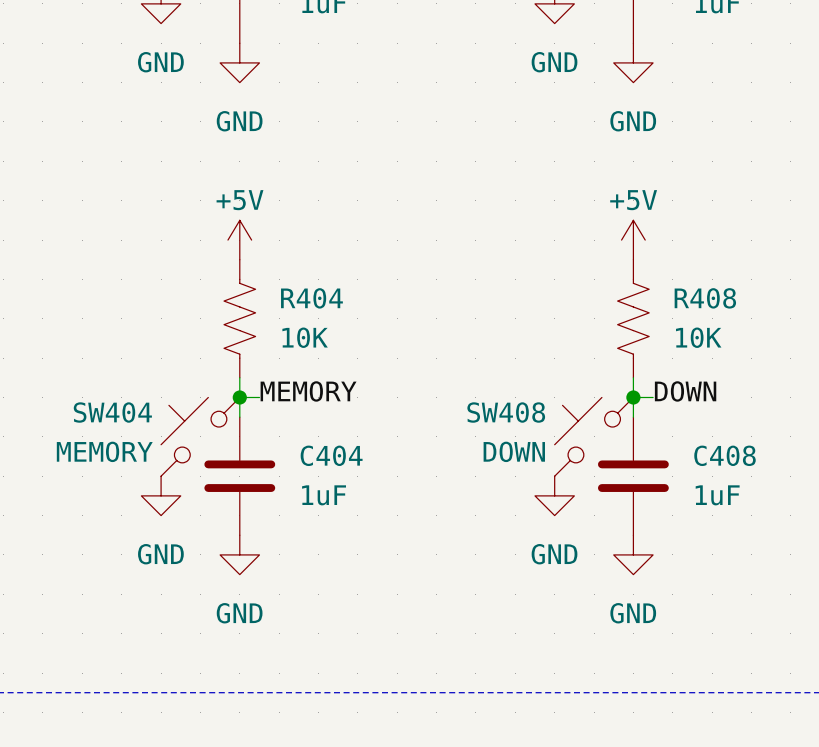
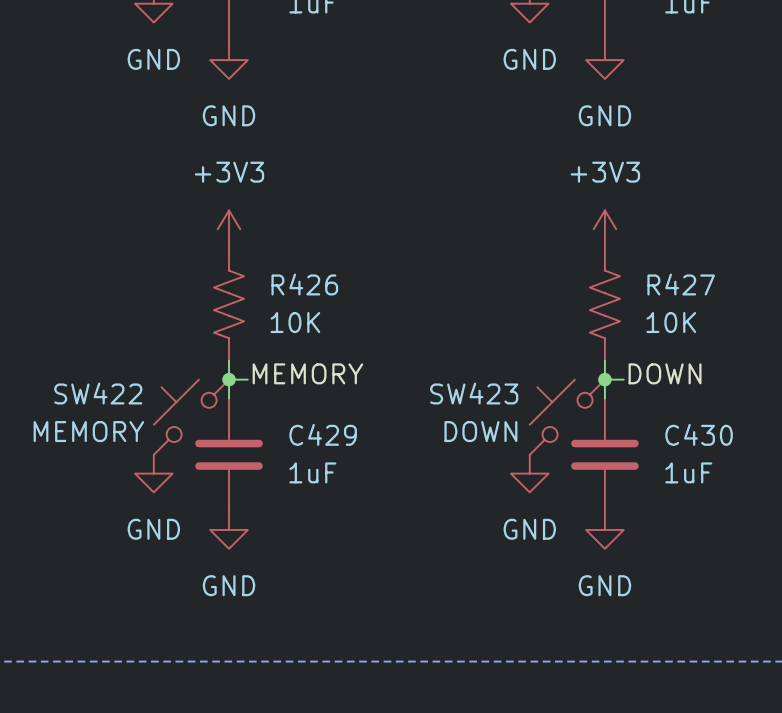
power symbol: +5V (239, 240) -> +3V3 (229, 229)
power symbol: +5V (633, 240) -> +3V3 (604, 229)
R404 name: R404 (311, 298) -> R426 (304, 284)
R408 name: R408 (705, 298) -> R427 (681, 284)
SW404 name: SW404 (112, 412) -> SW422 (98, 393)
SW408 name: SW408 (506, 412) -> SW423 (474, 393)
C404 name: C404 (331, 455) -> C429 (323, 434)
C408 name: C408 (725, 455) -> C430 (699, 434)

